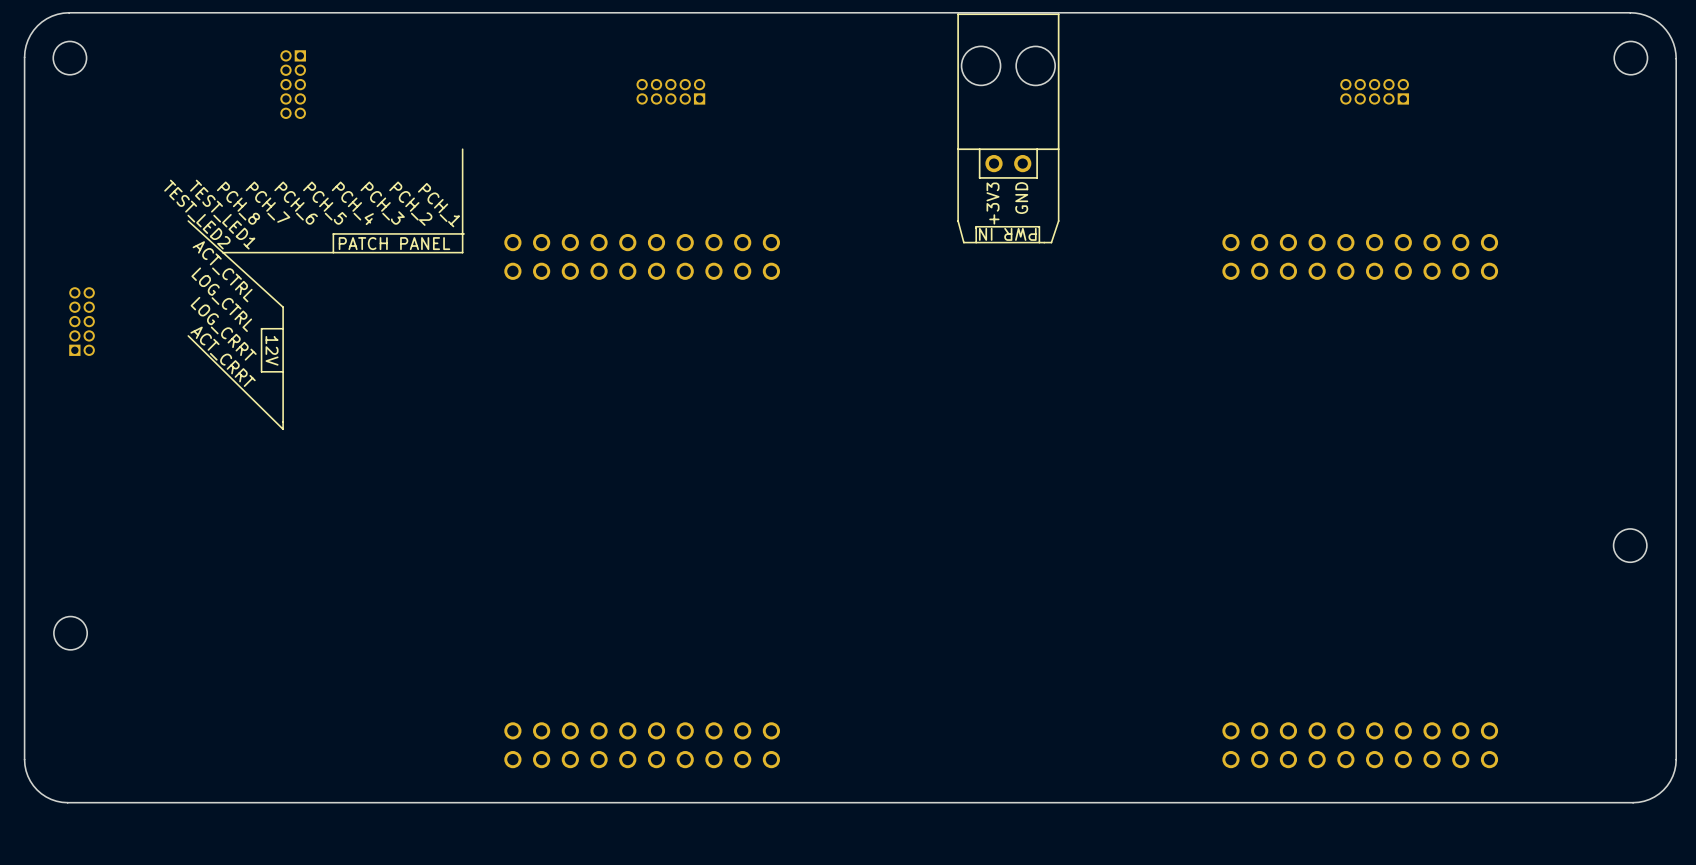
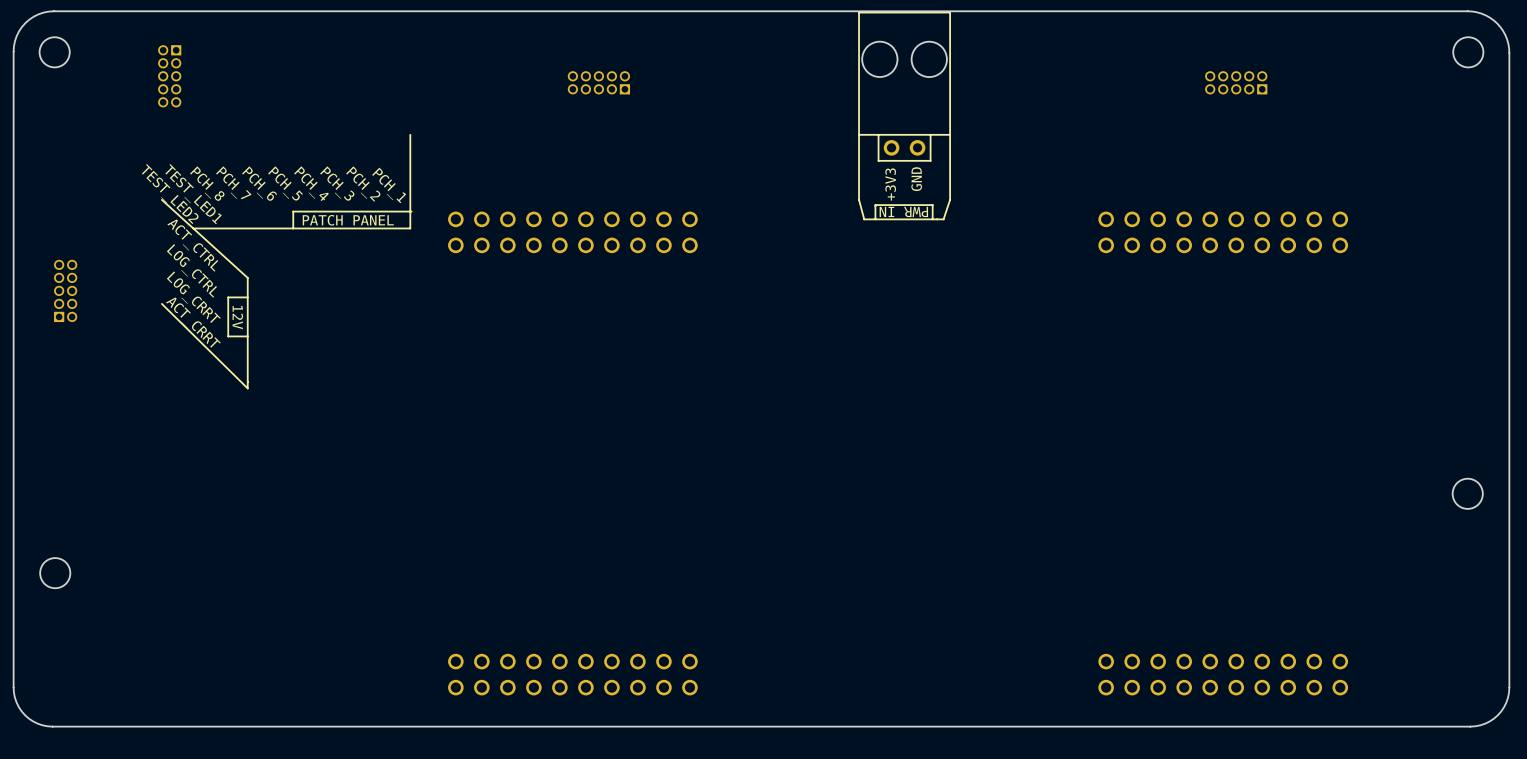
part position: (293, 84) -> (169, 76)

